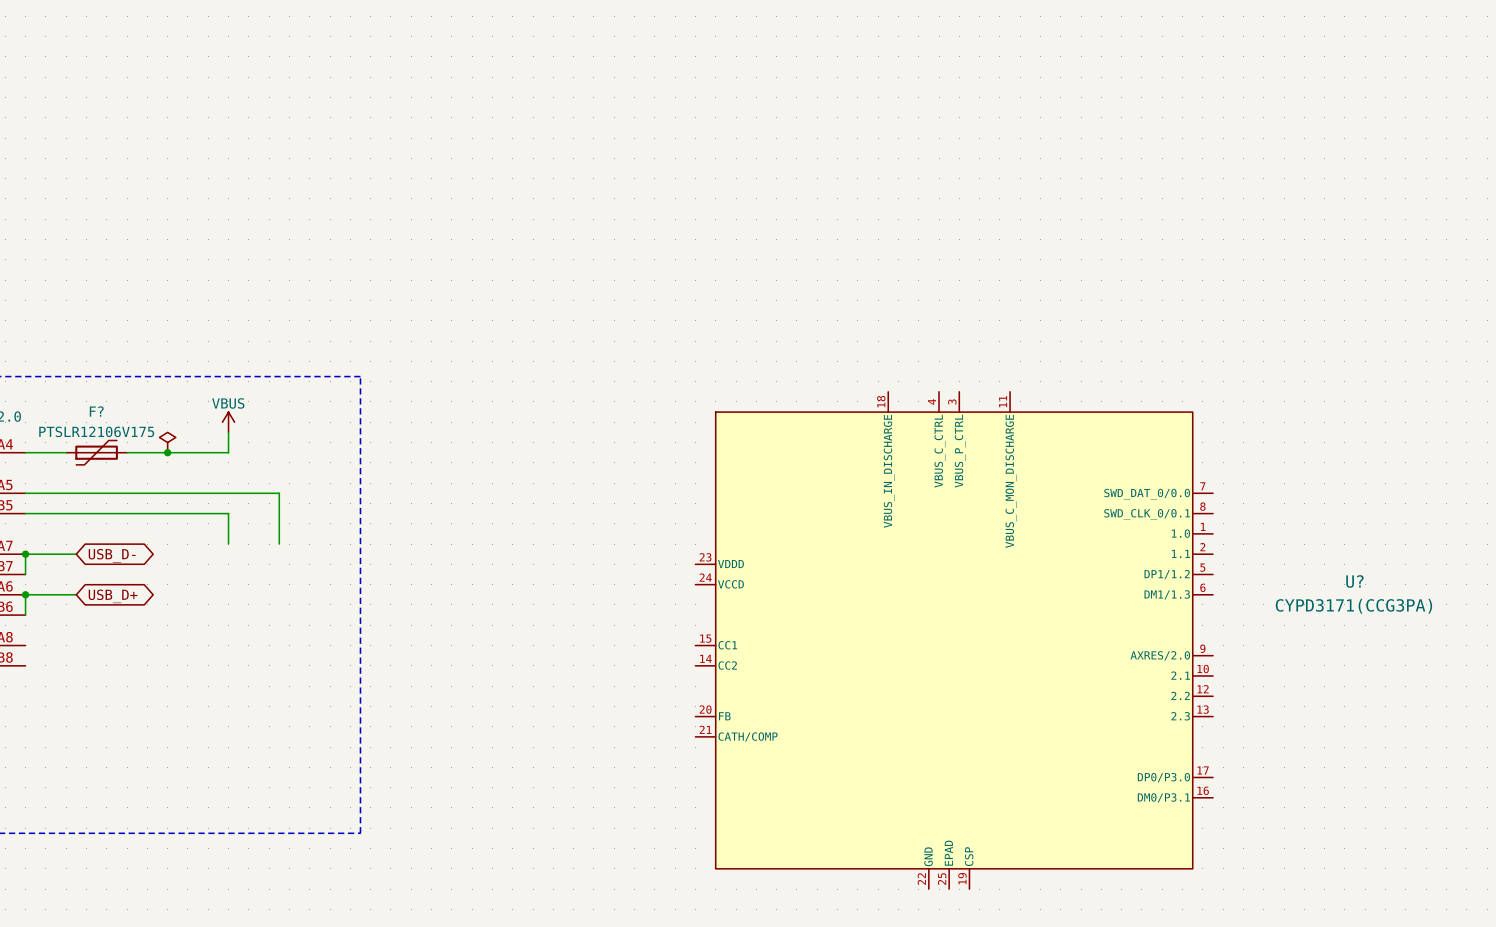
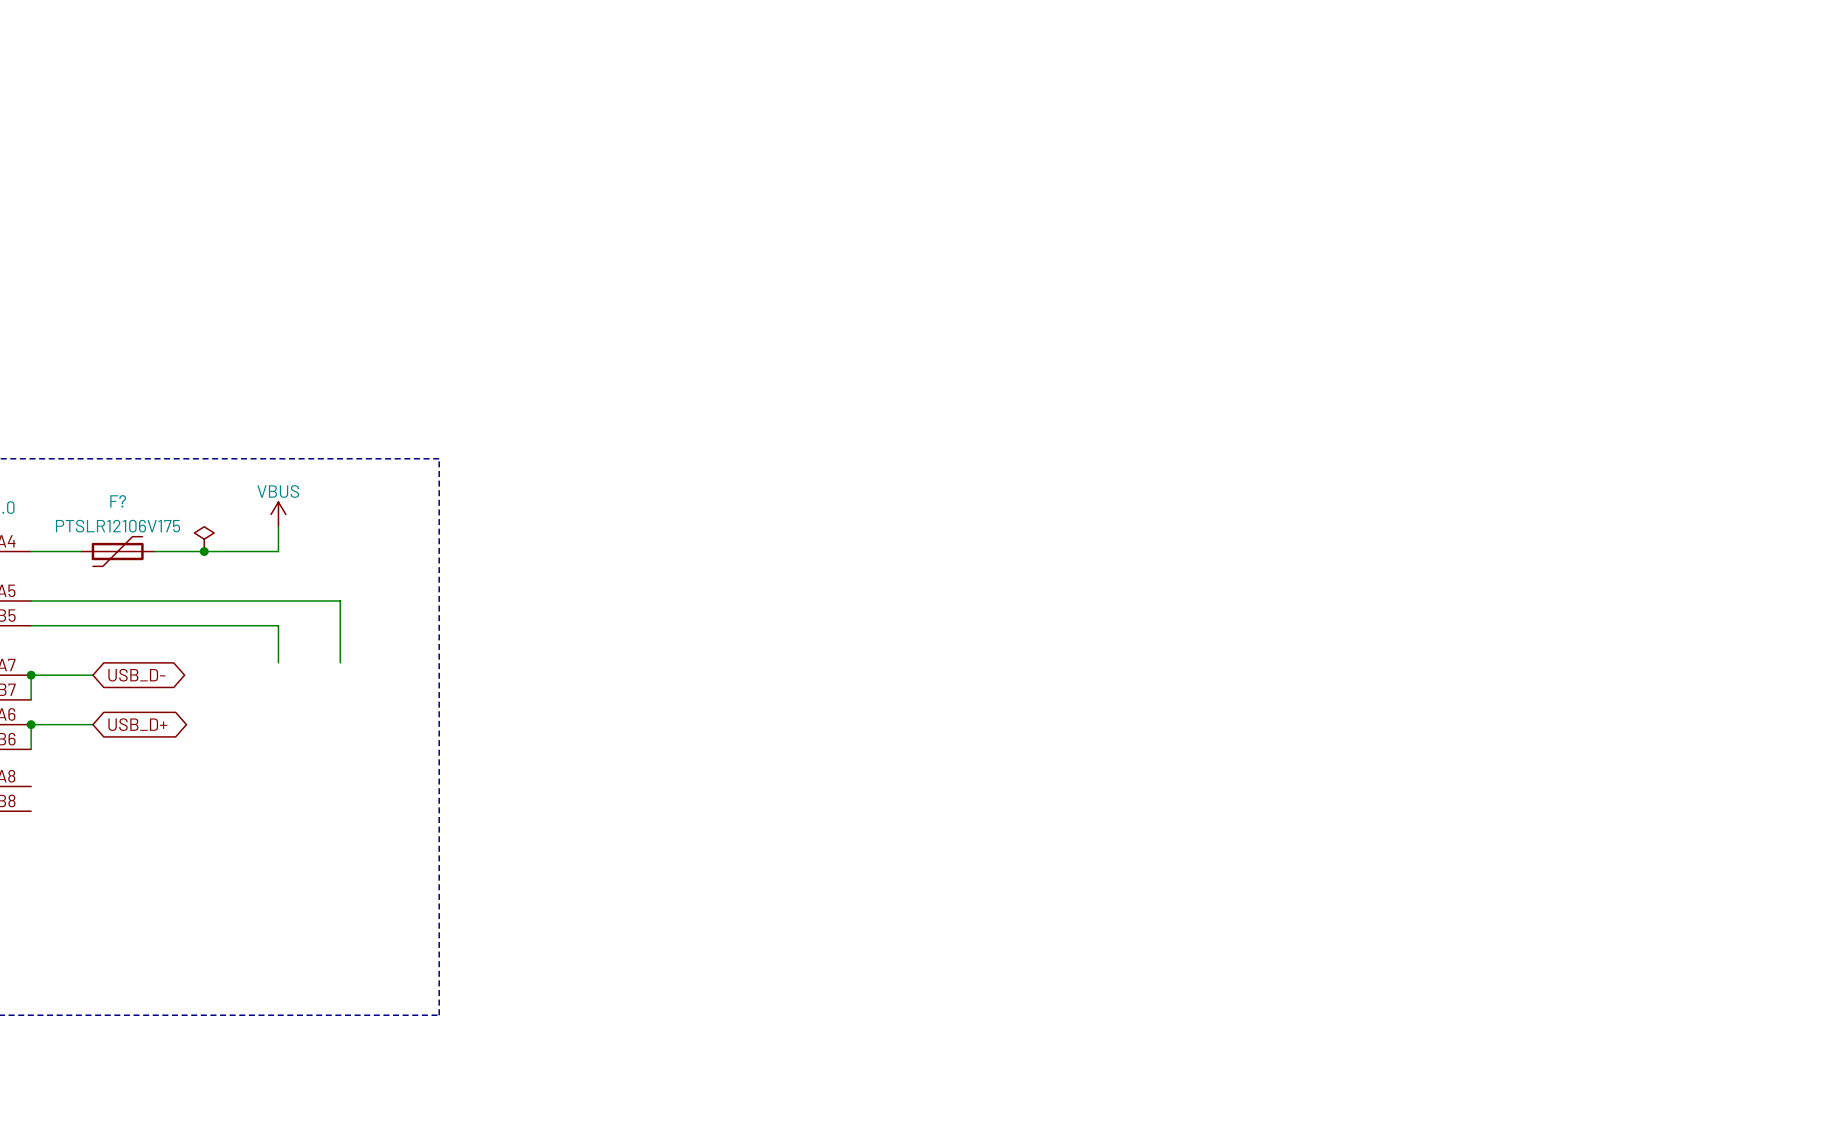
U?: CYPD3171(CCG3PA) (954, 640) -> none

